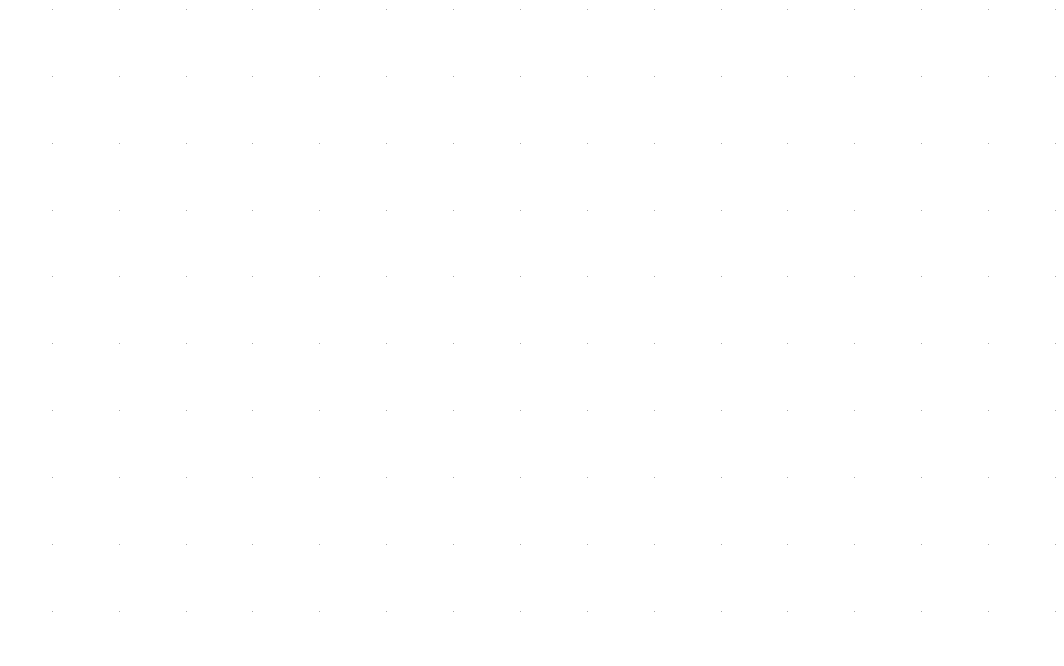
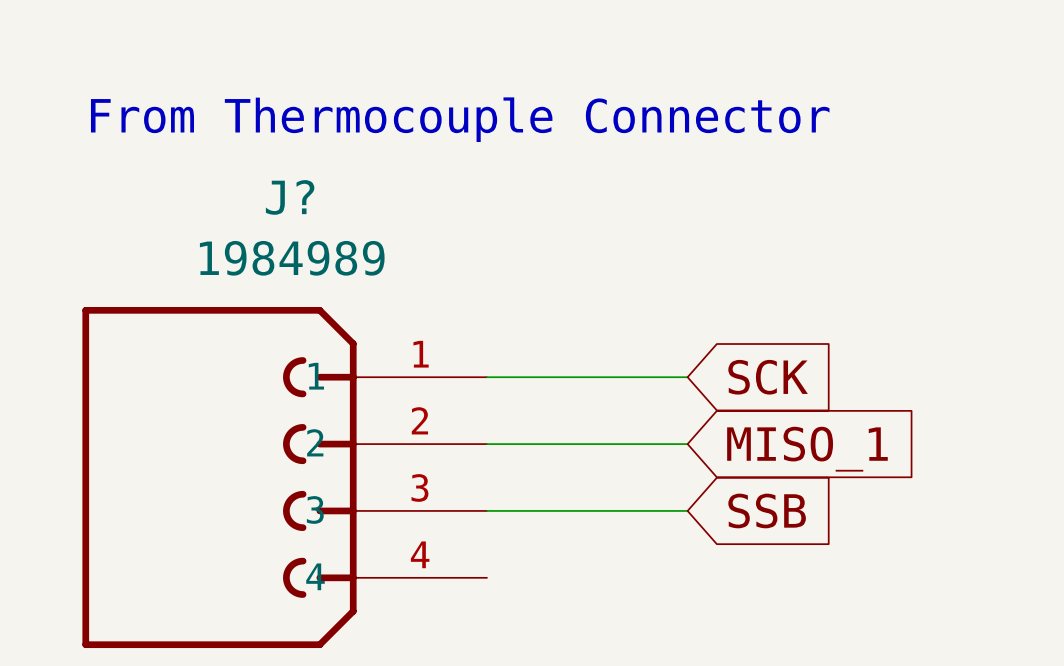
text: none -> From Thermocouple Connector (460, 119)
wire: none -> (486, 377) (687, 377)
global label: none -> SCK (768, 377)
wire: none -> (486, 444) (687, 444)
global label: none -> MISO_1 (807, 449)
J?: none -> 1984989 (284, 477)
wire: none -> (486, 510) (687, 510)
global label: none -> SSB (767, 510)

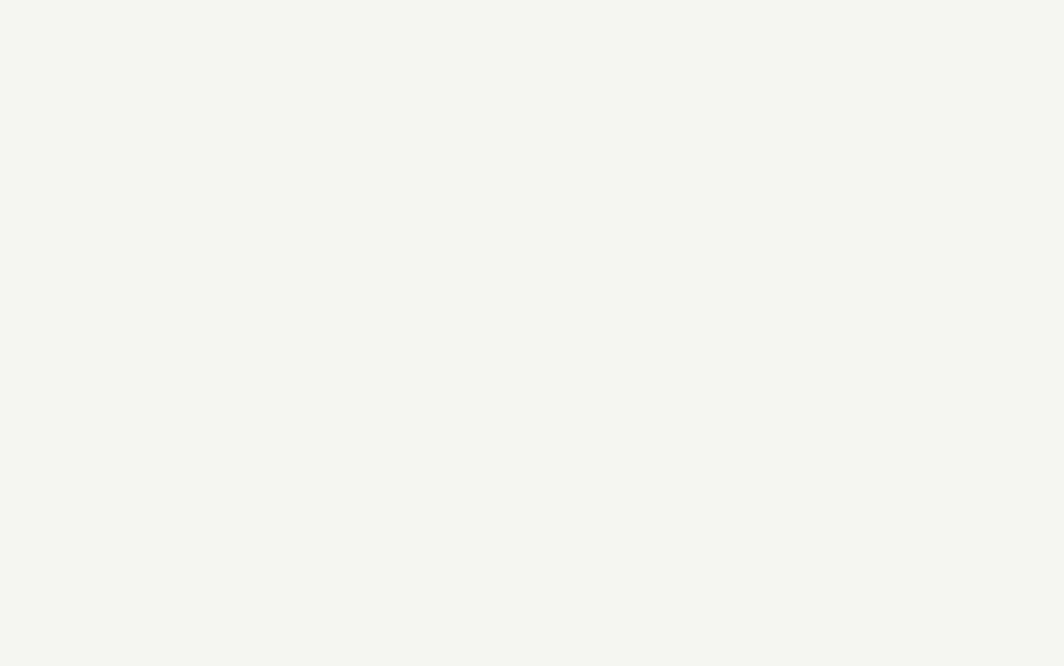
text: From Thermocouple Connector (460, 119) -> none
wire: (486, 377) (687, 377) -> none
global label: SCK (768, 377) -> none
wire: (486, 444) (687, 444) -> none
global label: MISO_1 (807, 449) -> none
J?: 1984989 (284, 477) -> none
wire: (486, 510) (687, 510) -> none
global label: SSB (767, 510) -> none

